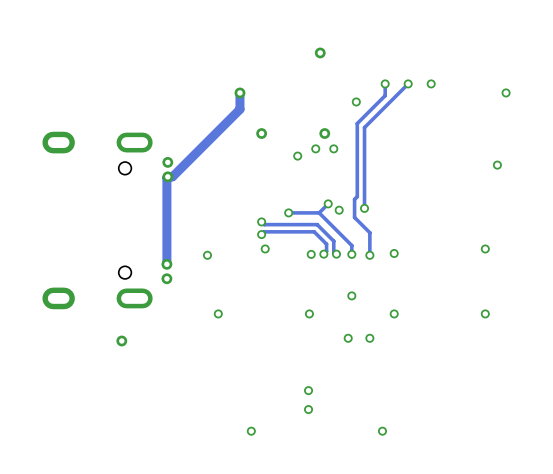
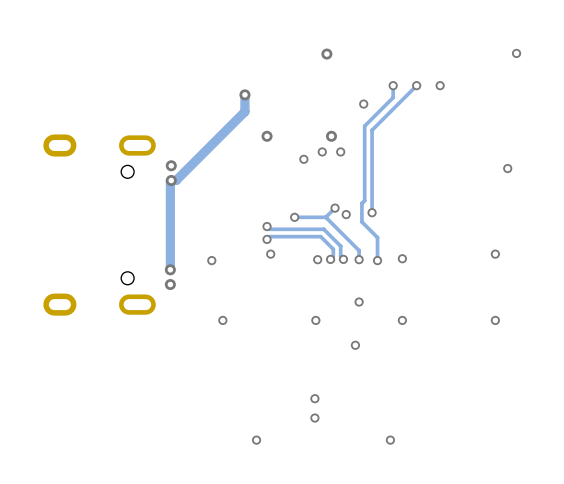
via position: (506, 92) -> (516, 53)
via: (369, 338) -> none
via: (121, 340) -> none

